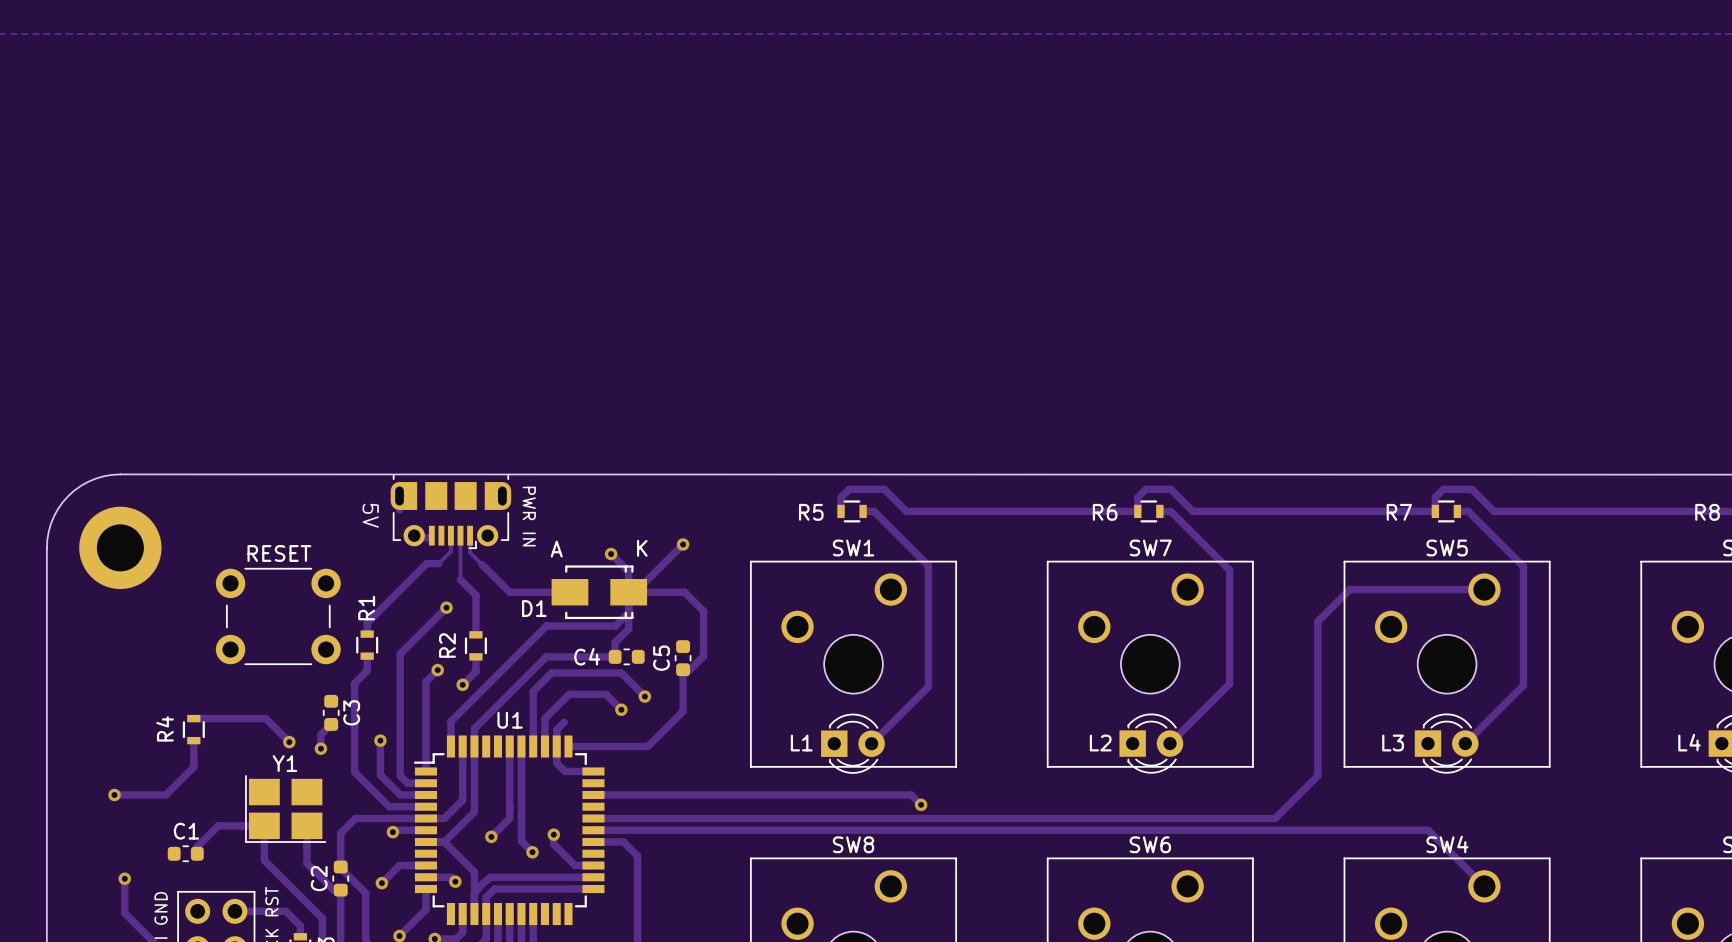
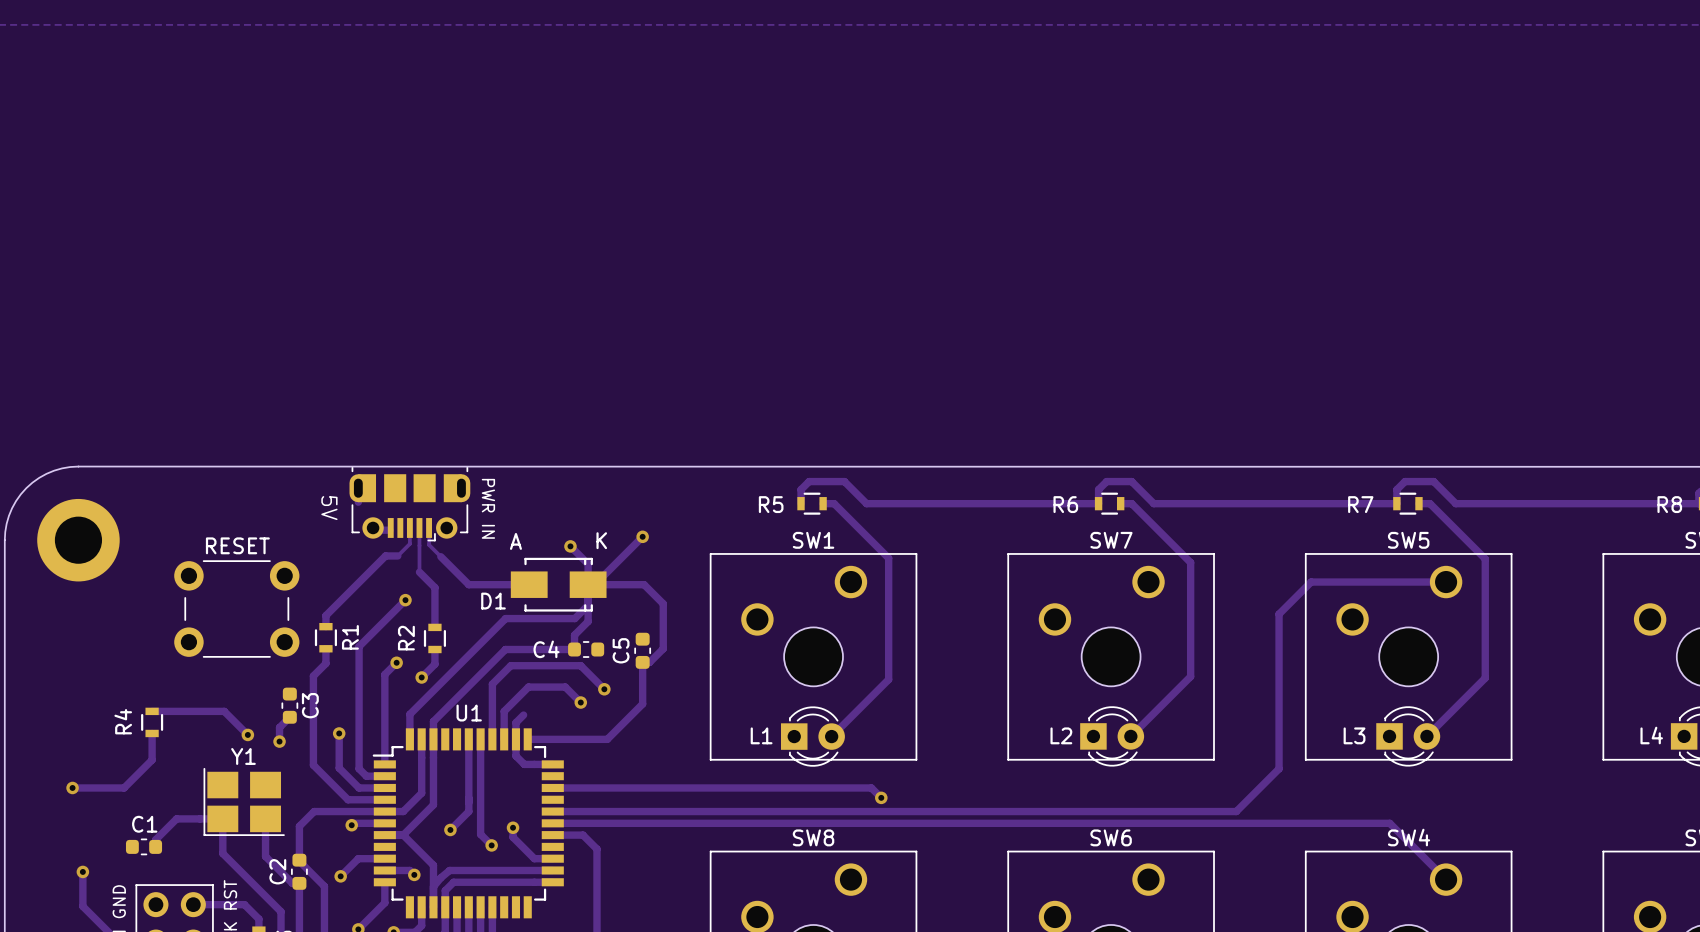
R1 name position: R1 (366, 608) -> R1 (350, 637)

